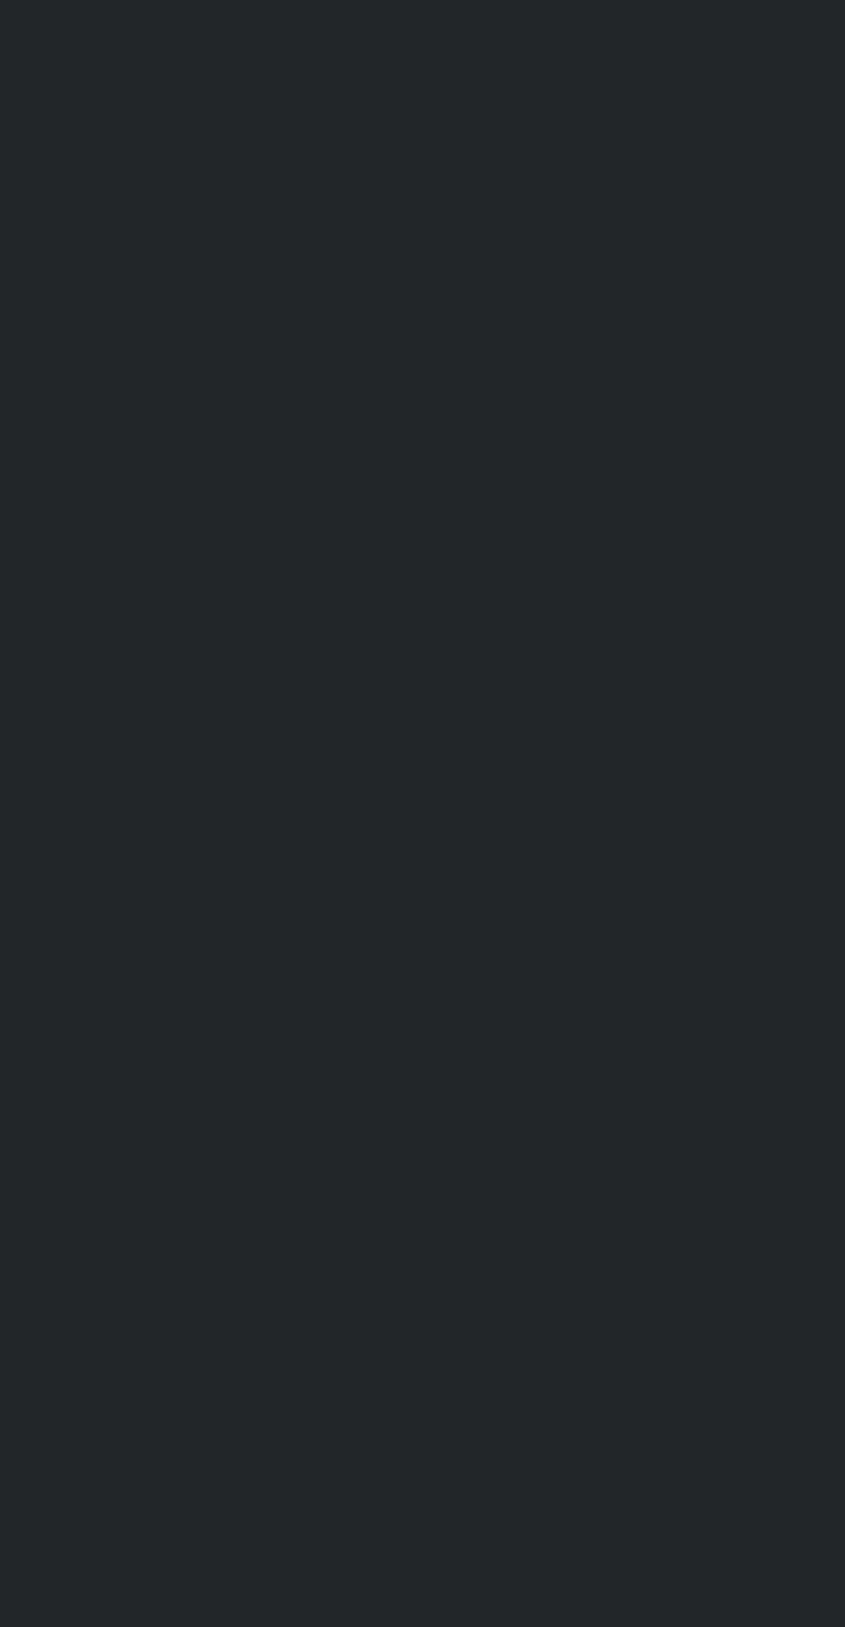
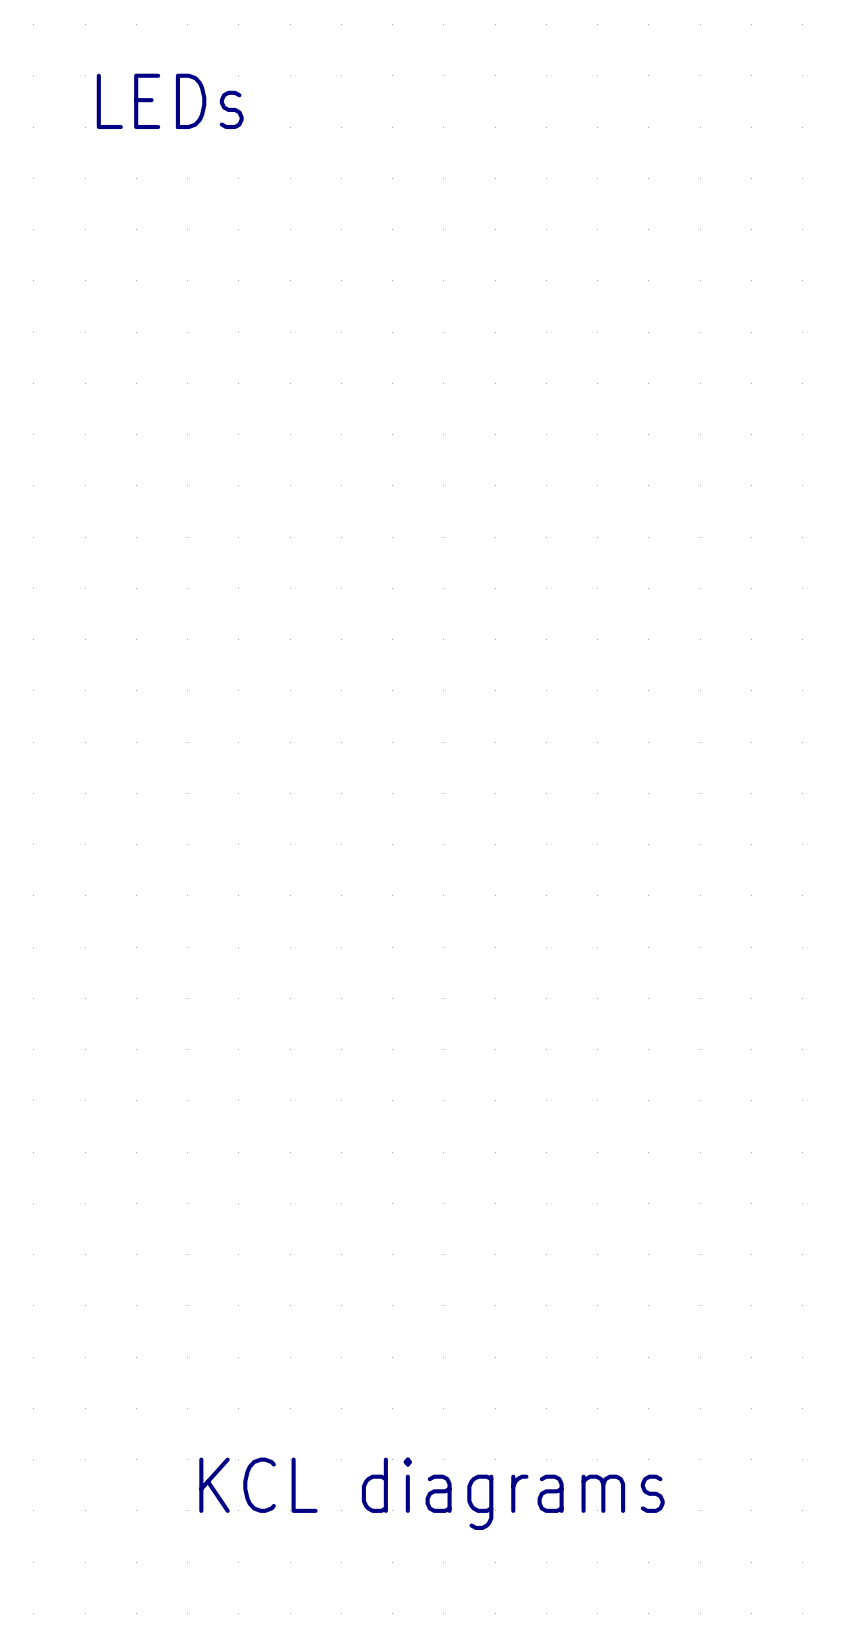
text: none -> LEDs (170, 101)
text: none -> KCL diagrams (432, 1493)

